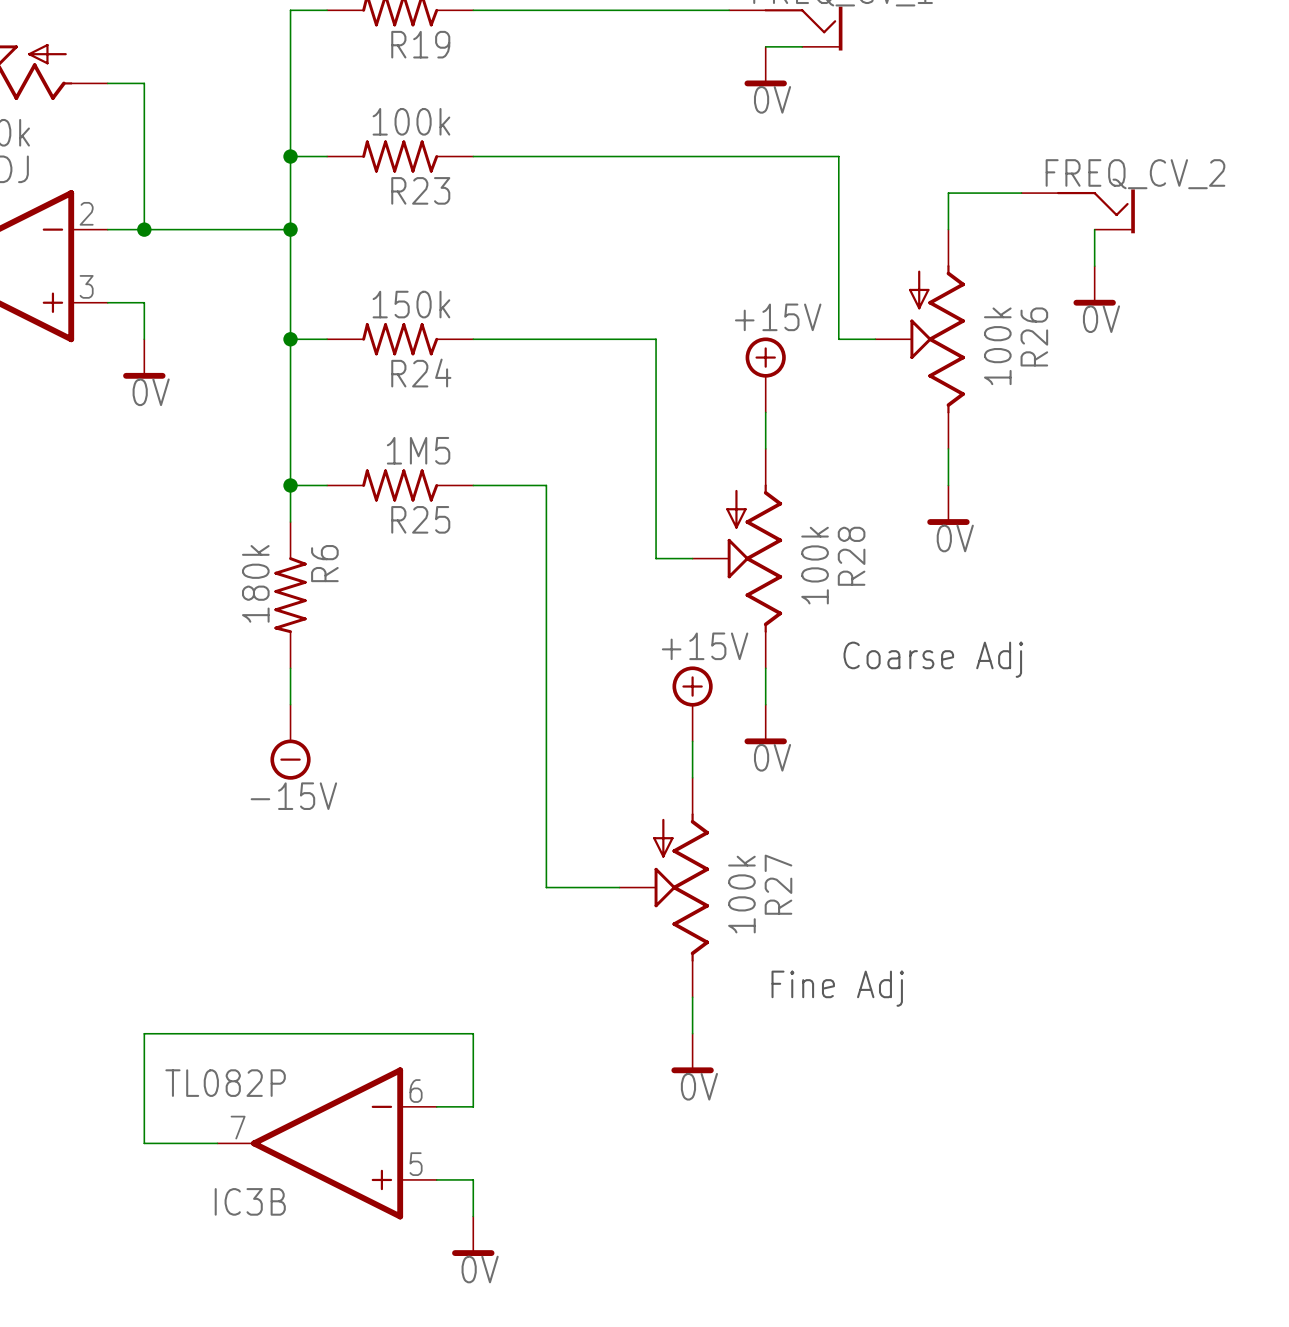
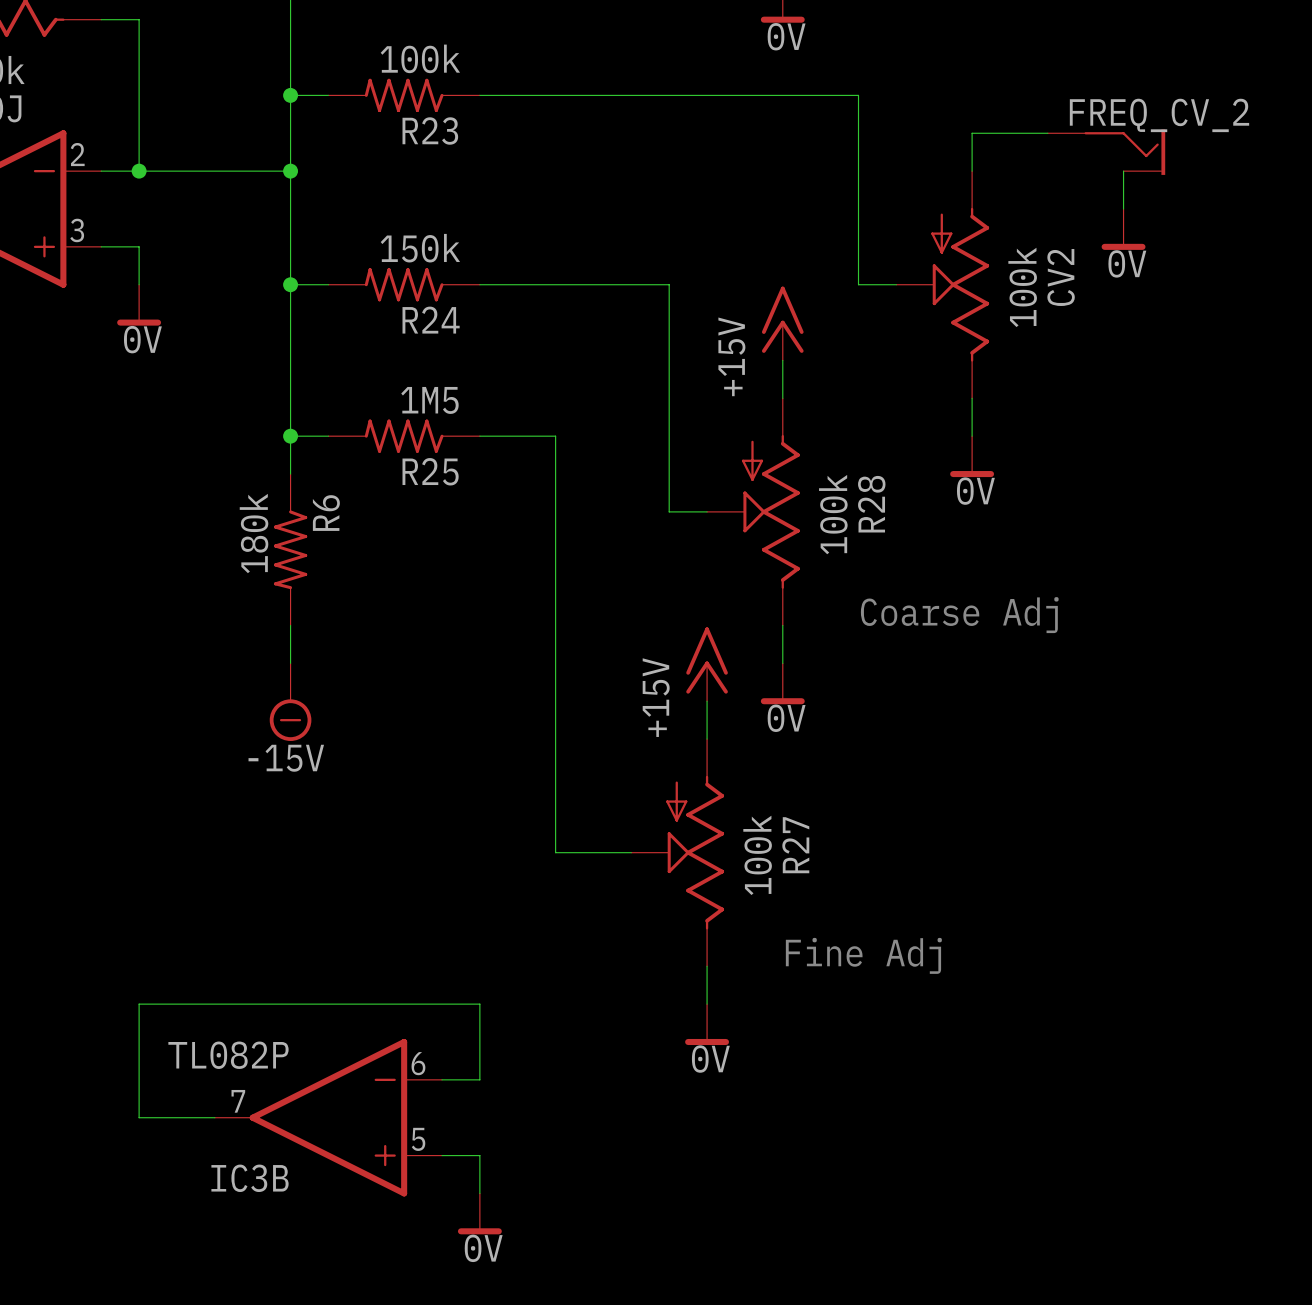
power symbol text position: +15V (778, 317) -> +15V (731, 356)
R26 name: R26 (1034, 336) -> CV2 (1061, 277)
power symbol shape: [745, 337, 786, 413] -> [761, 286, 804, 361]
power symbol text position: +15V (705, 646) -> +15V (656, 697)
power symbol shape: [672, 666, 713, 742] -> [686, 627, 728, 702]

